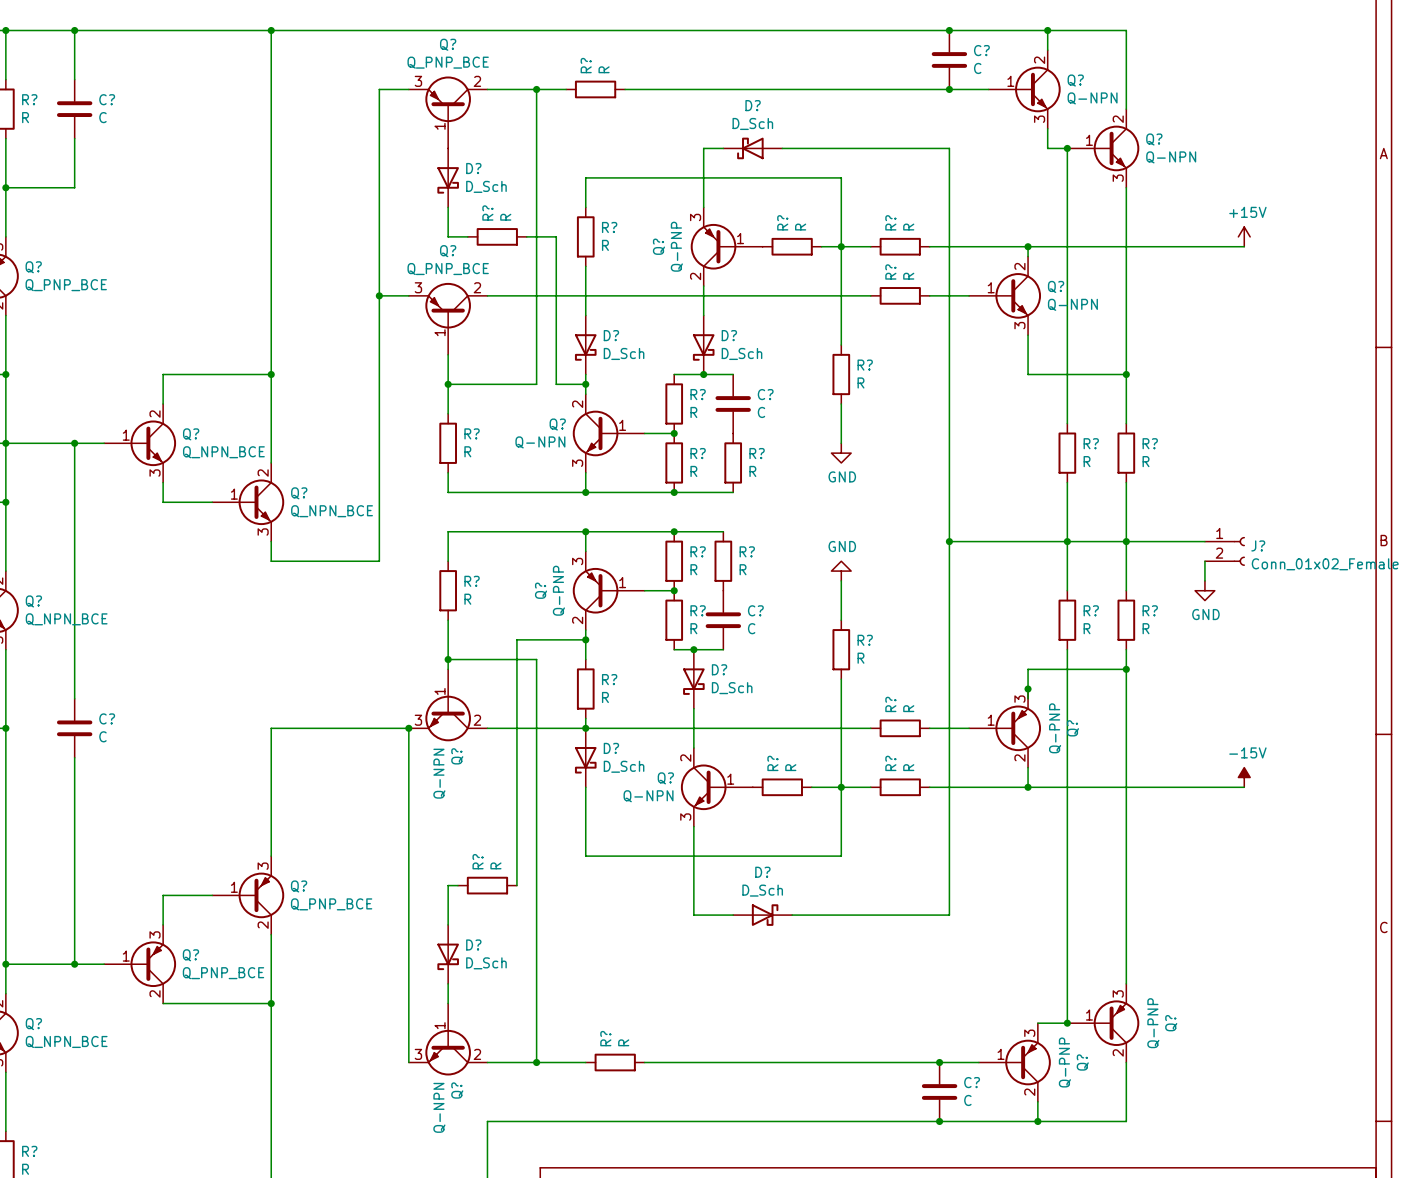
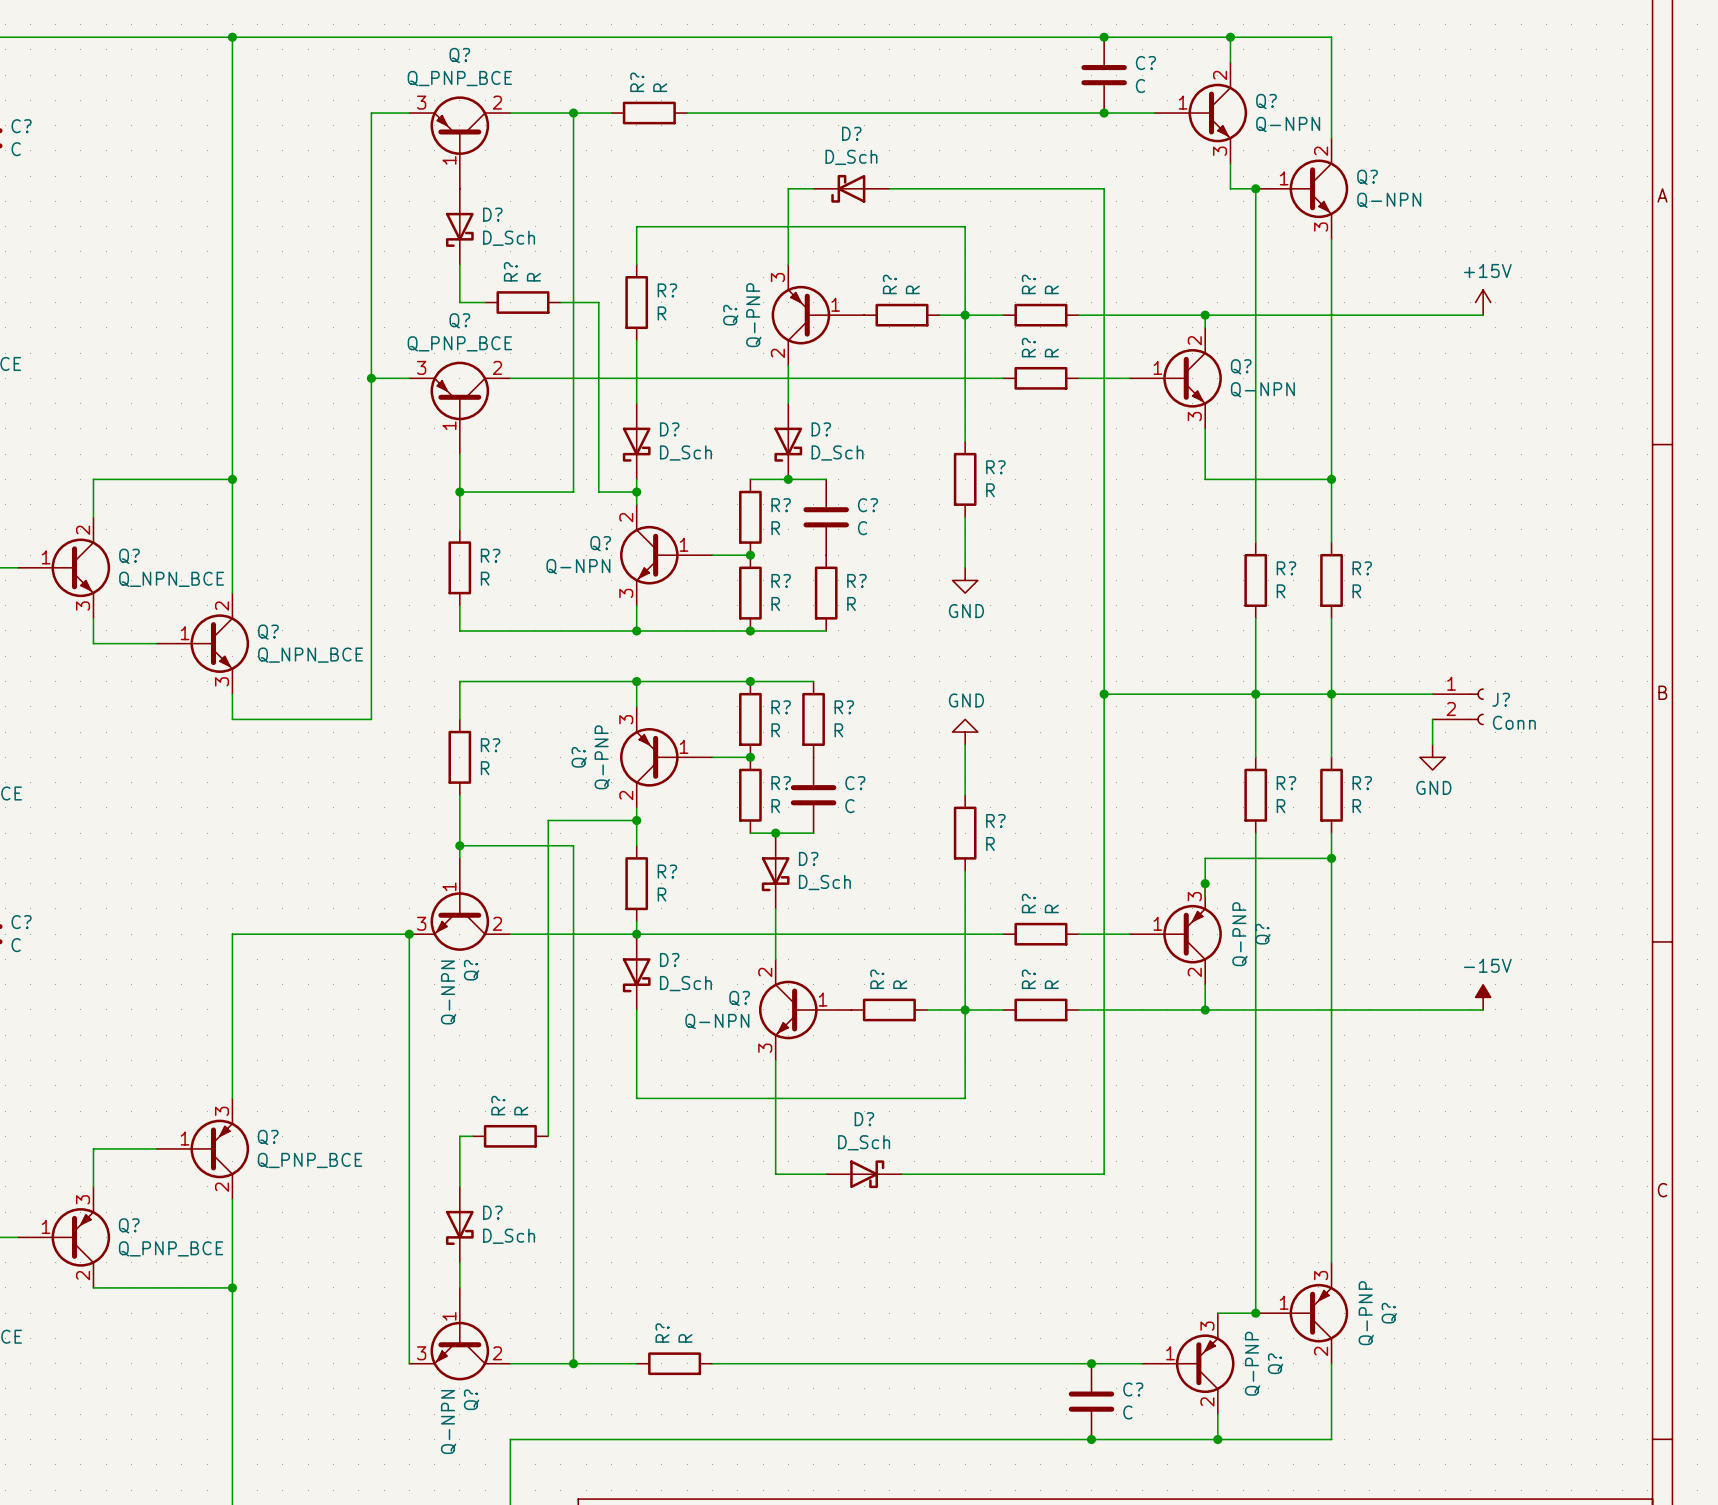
J? value: Conn_01x02_Female (1325, 564) -> Conn (1514, 722)

